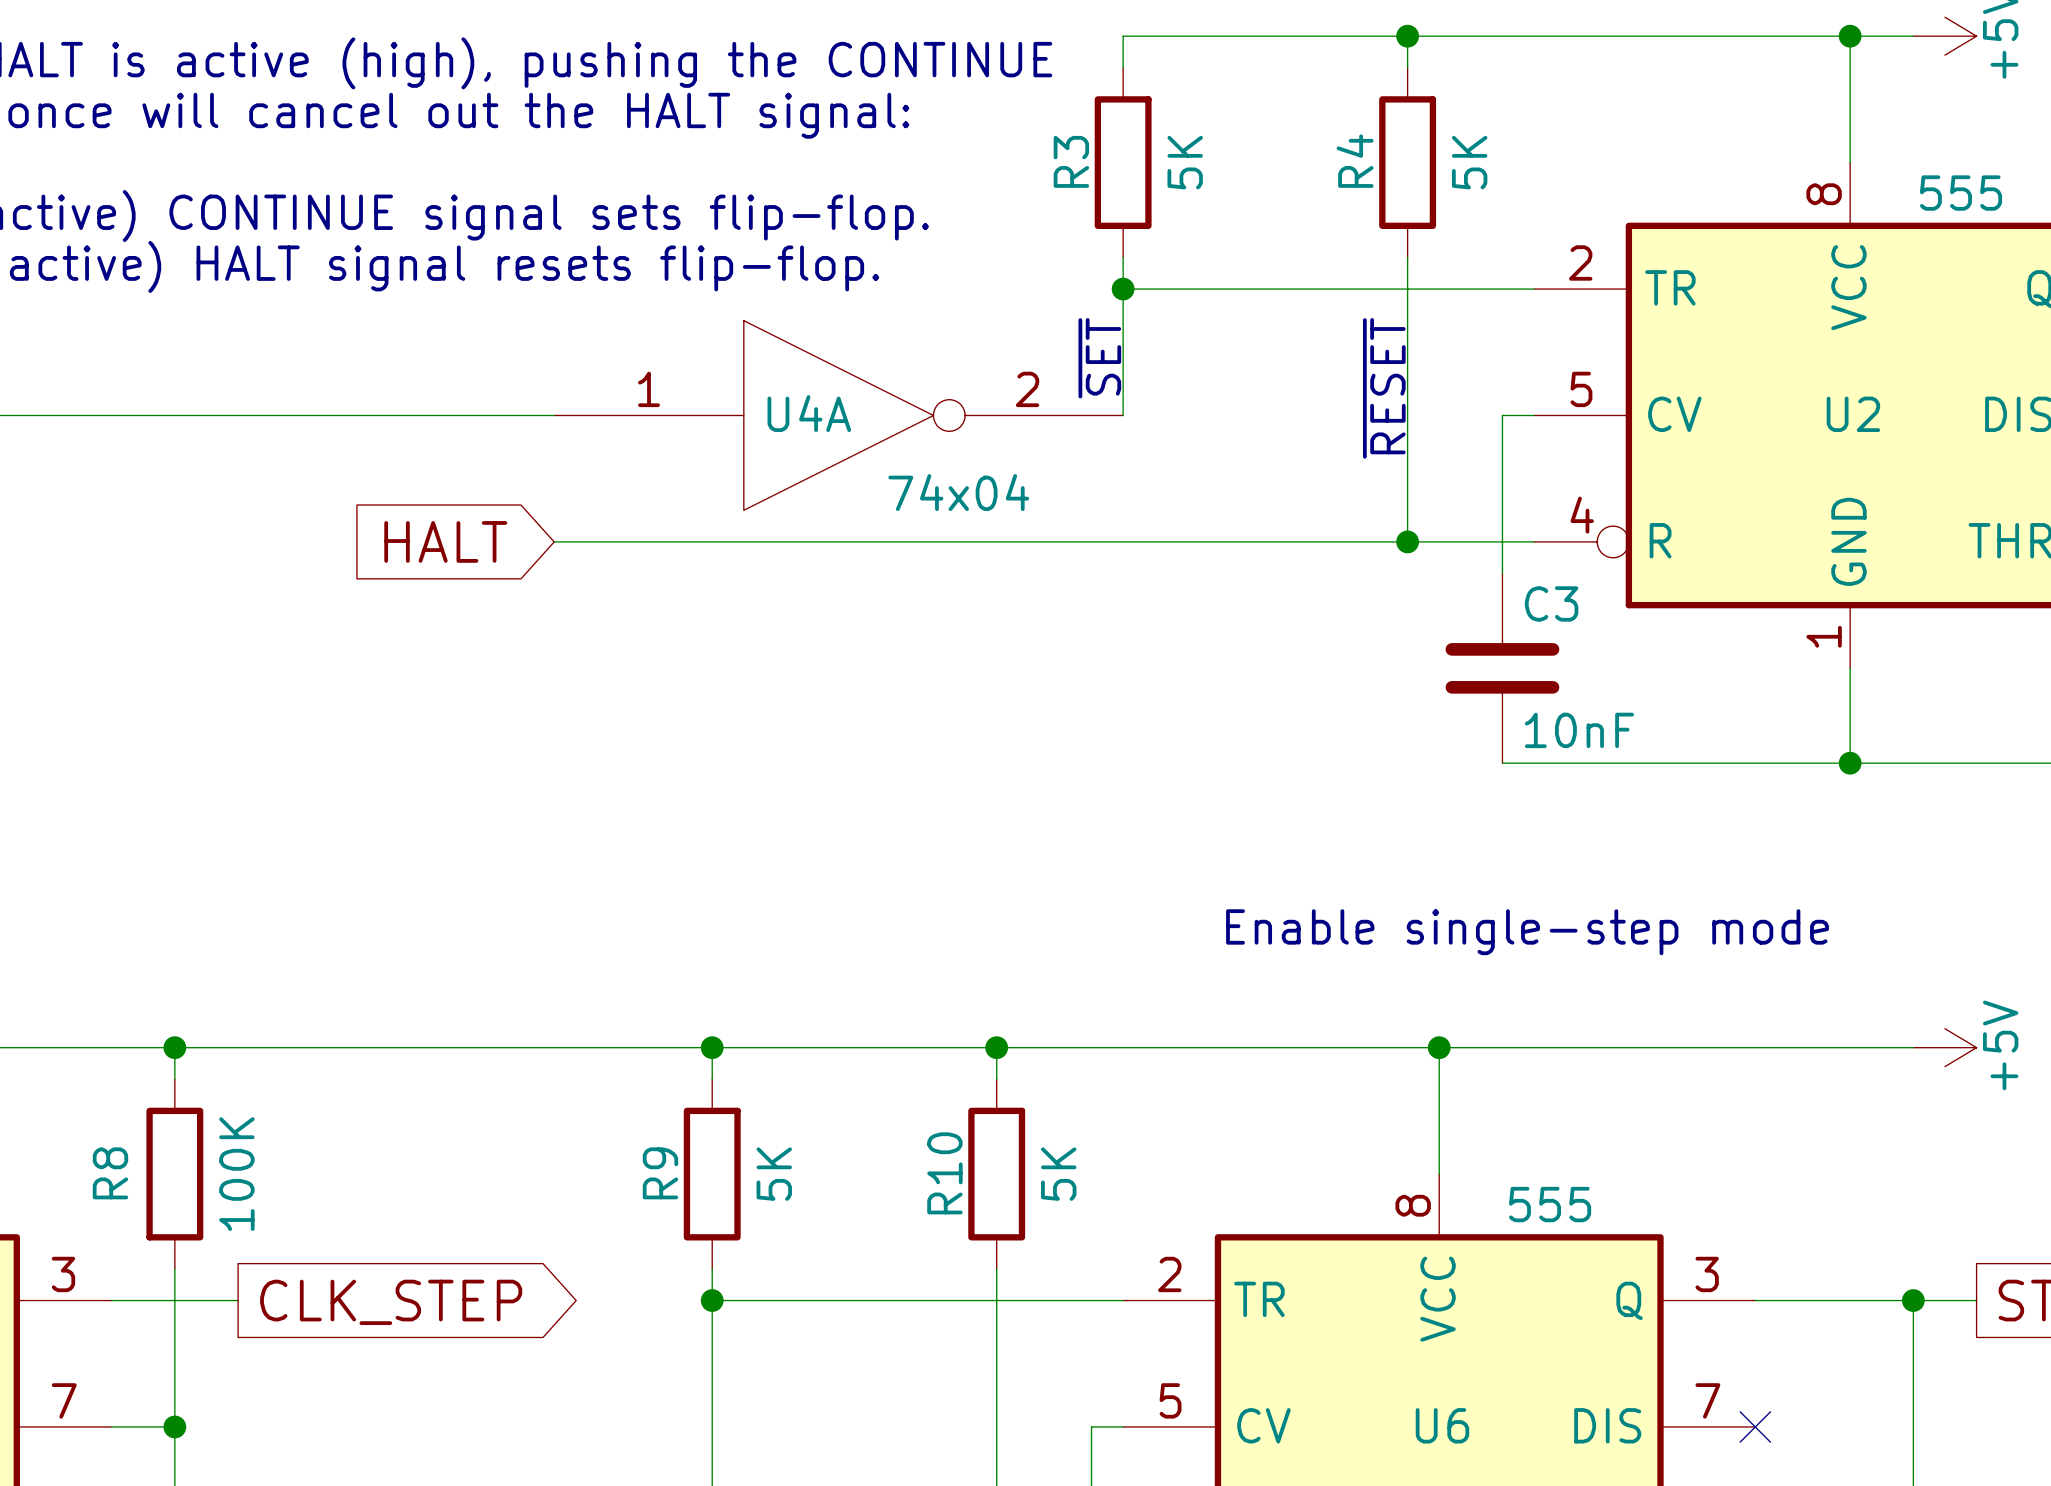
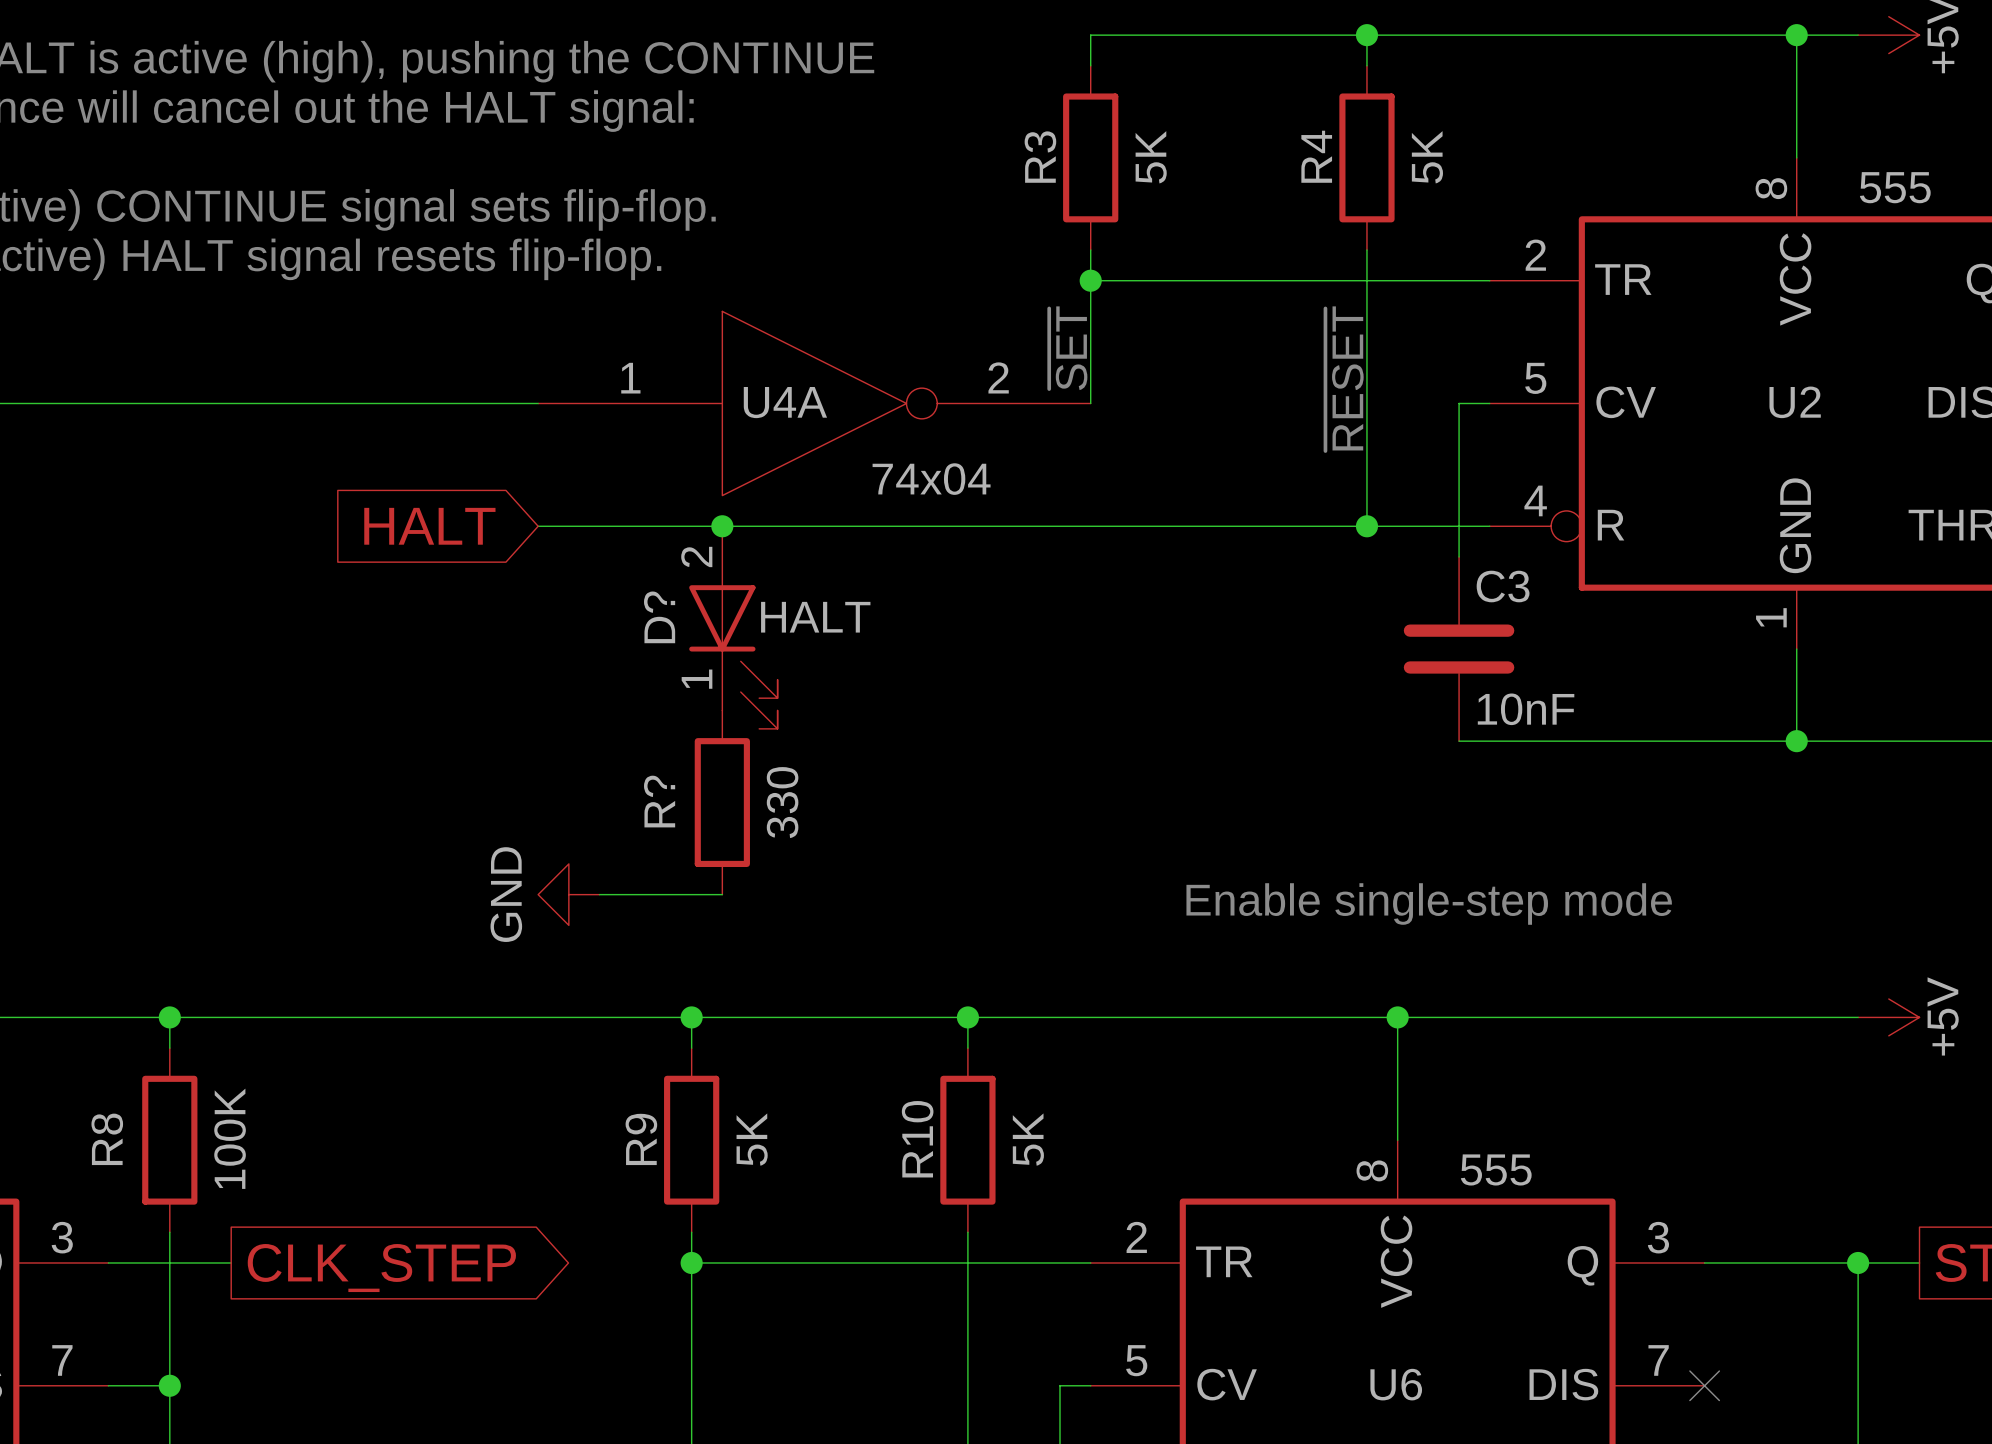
junction: none -> (722, 526)
D?: none -> HALT (733, 627)
R?: none -> 330 (722, 802)
power symbol: none -> GND (568, 894)
wire: none -> (599, 894) (722, 894)

